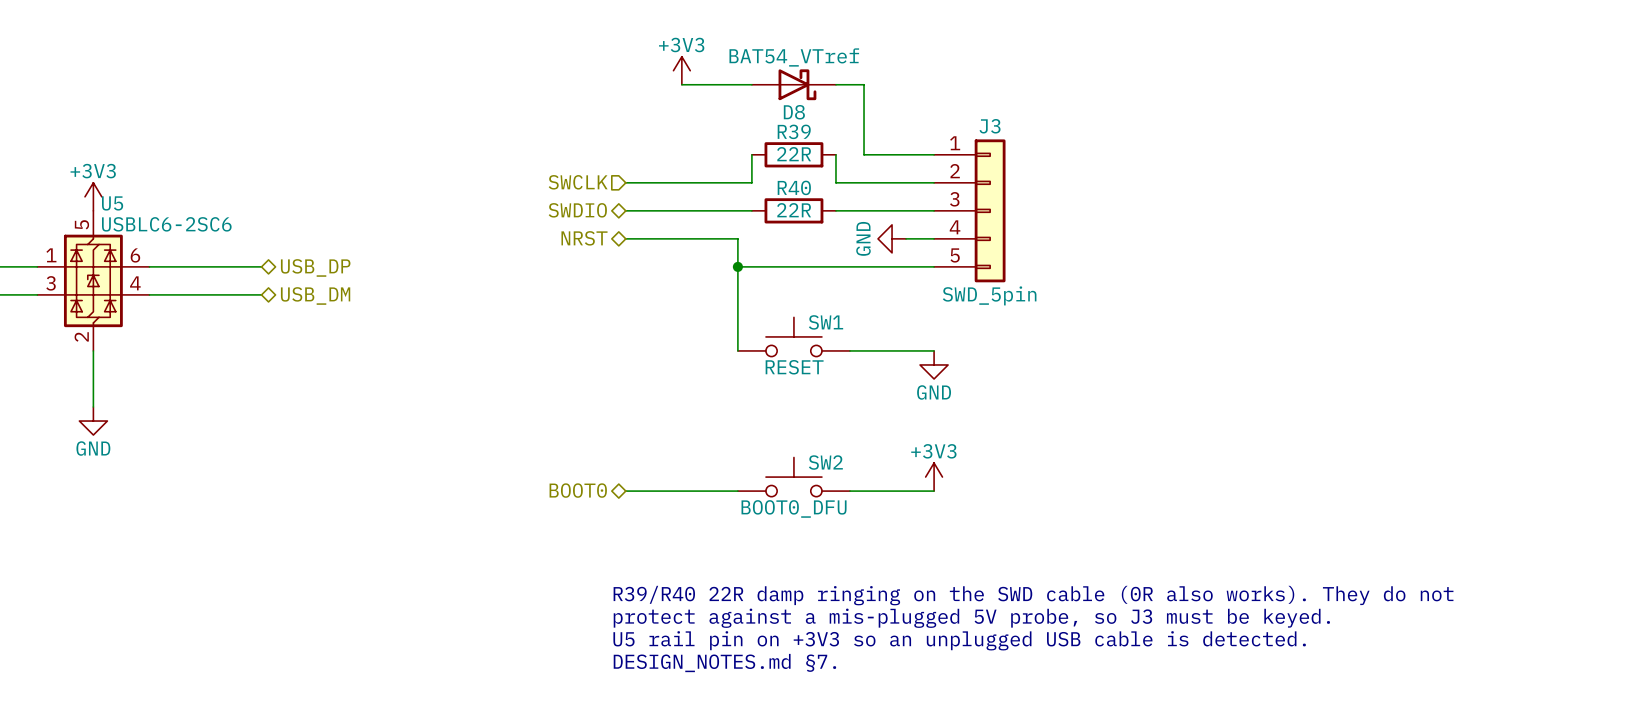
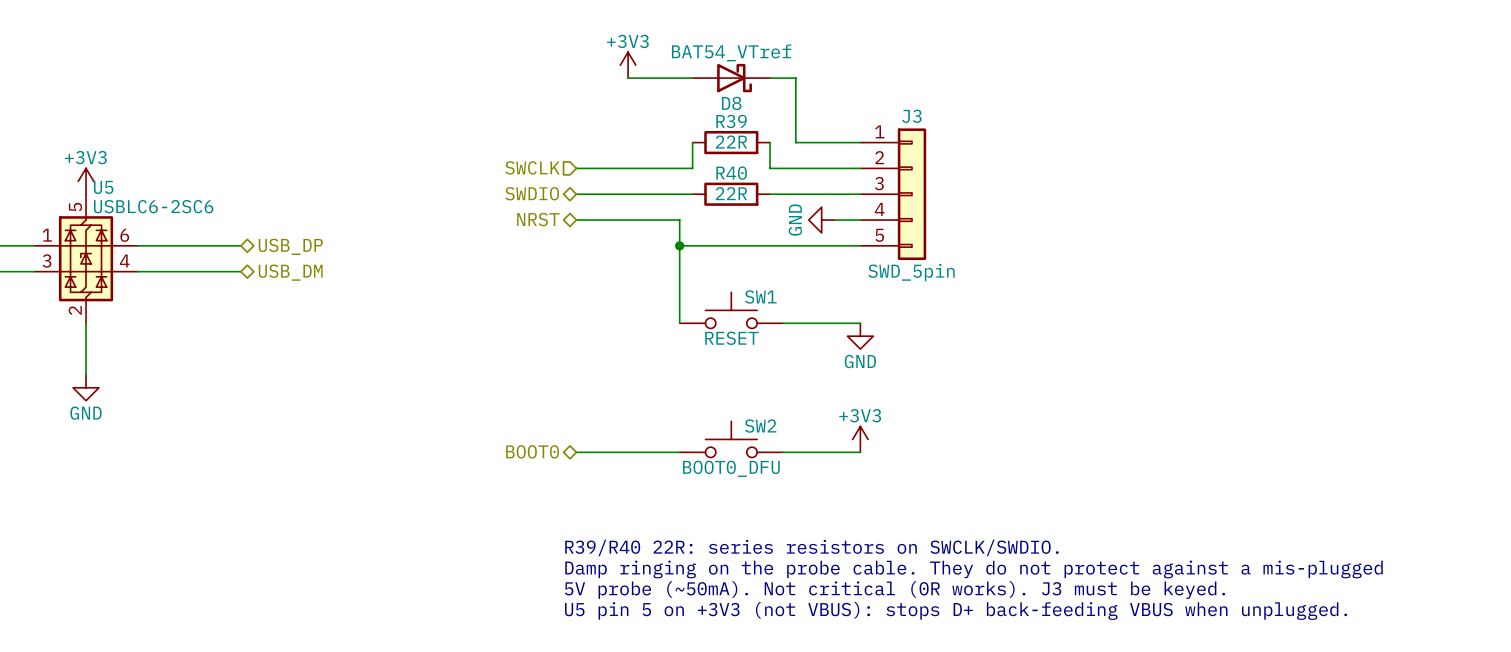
text: R39/R40 22R damp ringing on the SWD cable (0R also works). They do not (1033, 595) -> R39/R40 22R: series resistors on SWCLK/SWDIO. (811, 547)
text: protect against a mis-plugged 5V probe, so J3 must be keyed. (971, 618) -> Damp ringing on the probe cable. They do not protect against a mis-plugged (974, 569)
text: U5 rail pin on +3V3 so an unplugged USB cable is detected. (959, 640) -> 5V probe (~50mA). Not critical (0R works). J3 must be keyed. (894, 590)
text: DESIGN_NOTES.md §7. (724, 663) -> U5 pin 5 on +3V3 (not VBUS): stops D+ back-feeding VBUS when unplugged. (956, 610)

